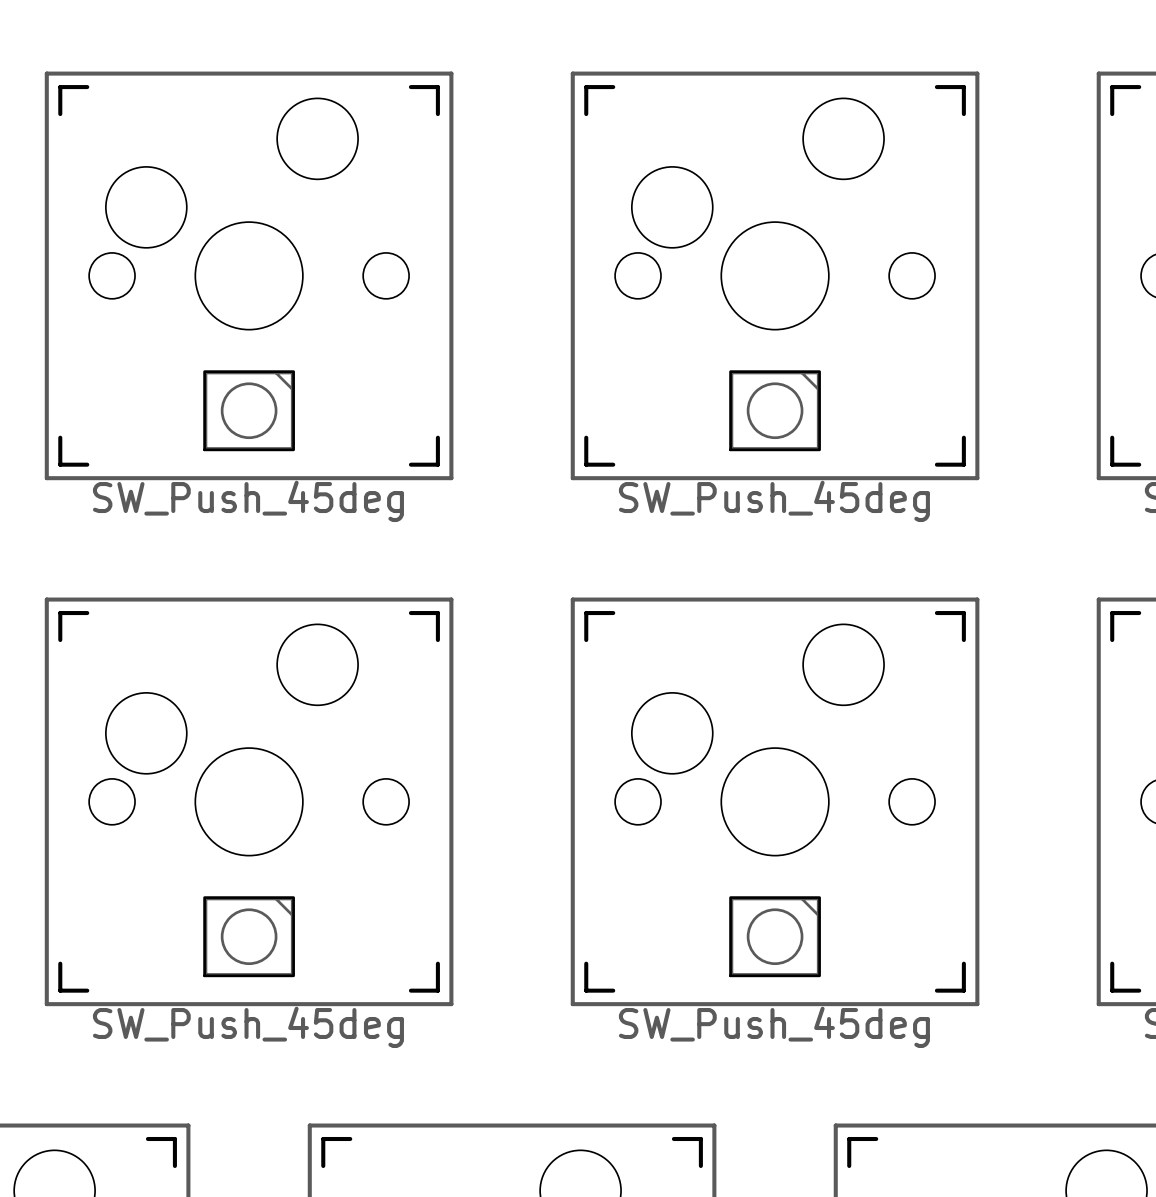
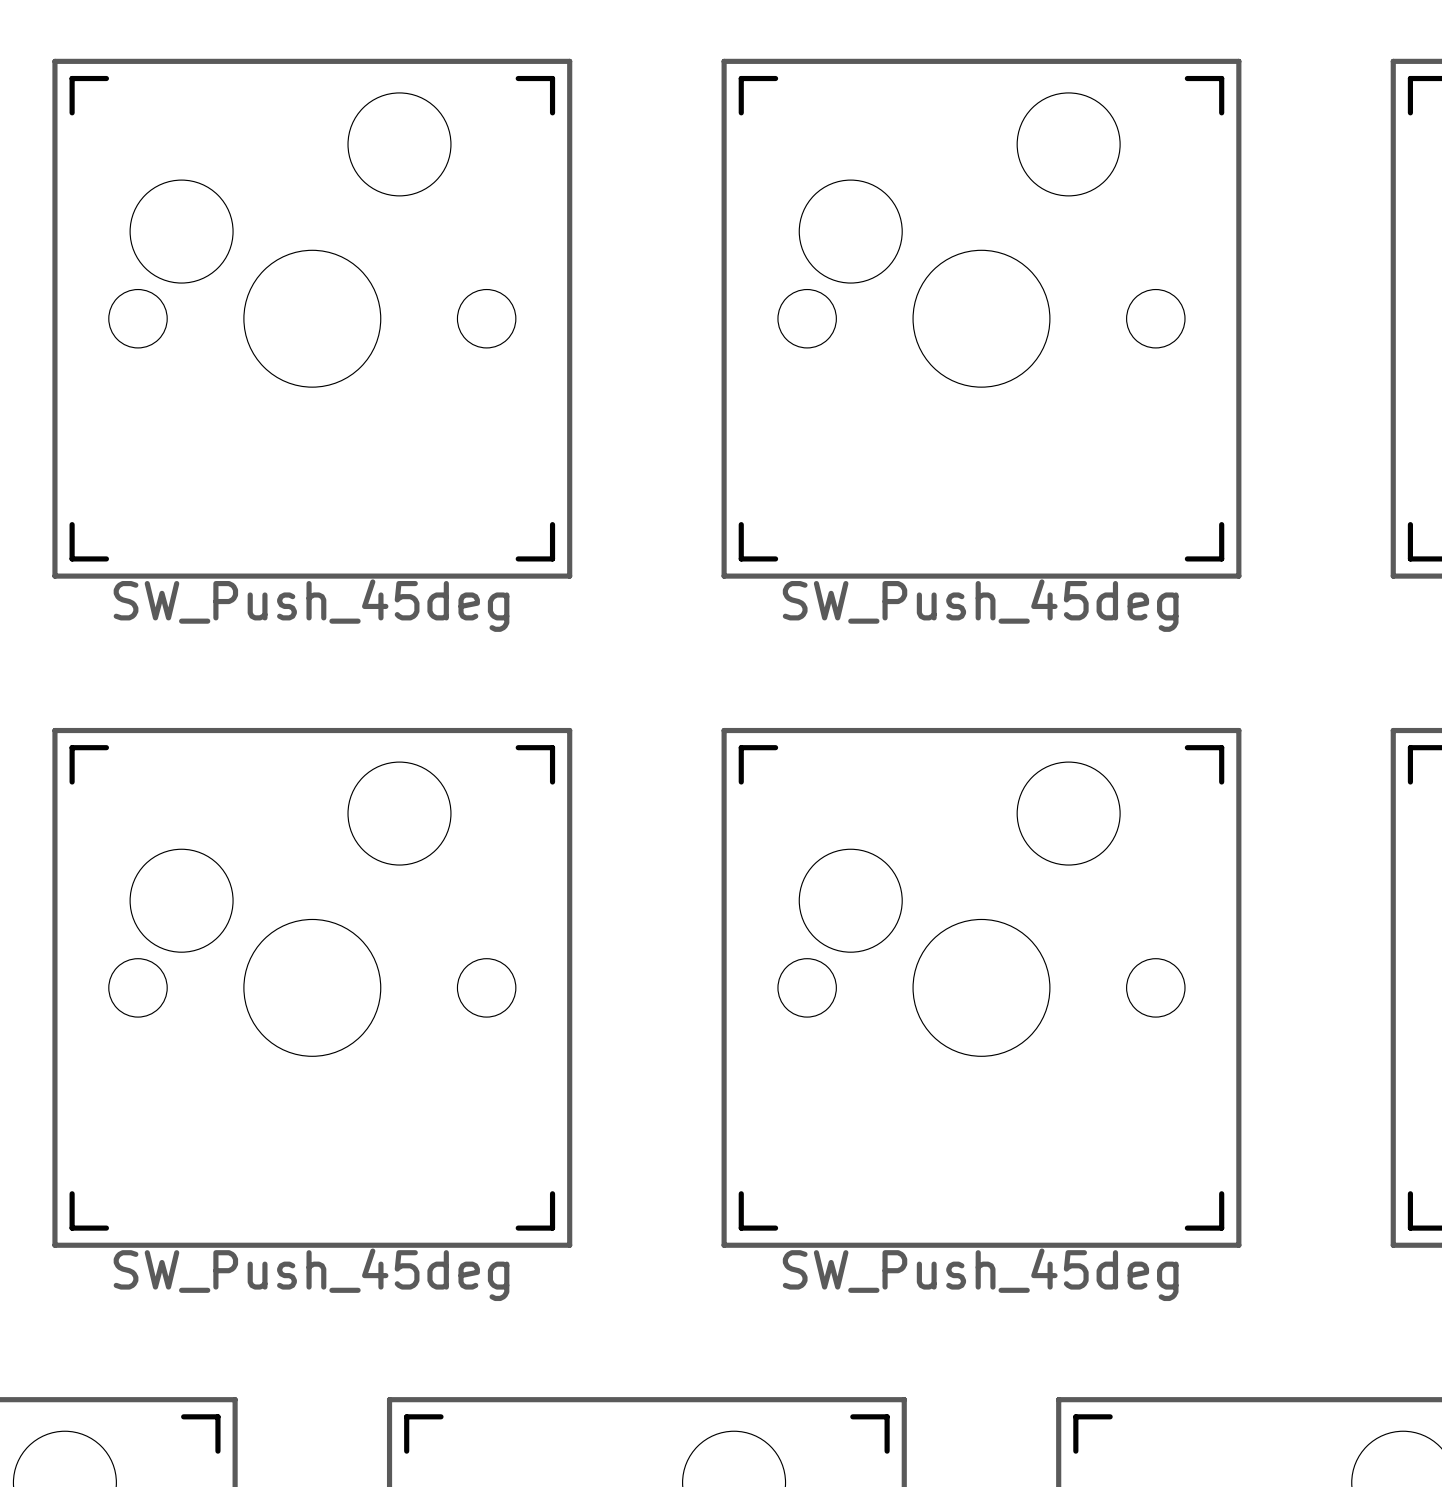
part: (249, 410) -> none
part: (775, 410) -> none
part: (249, 936) -> none
part: (775, 936) -> none

